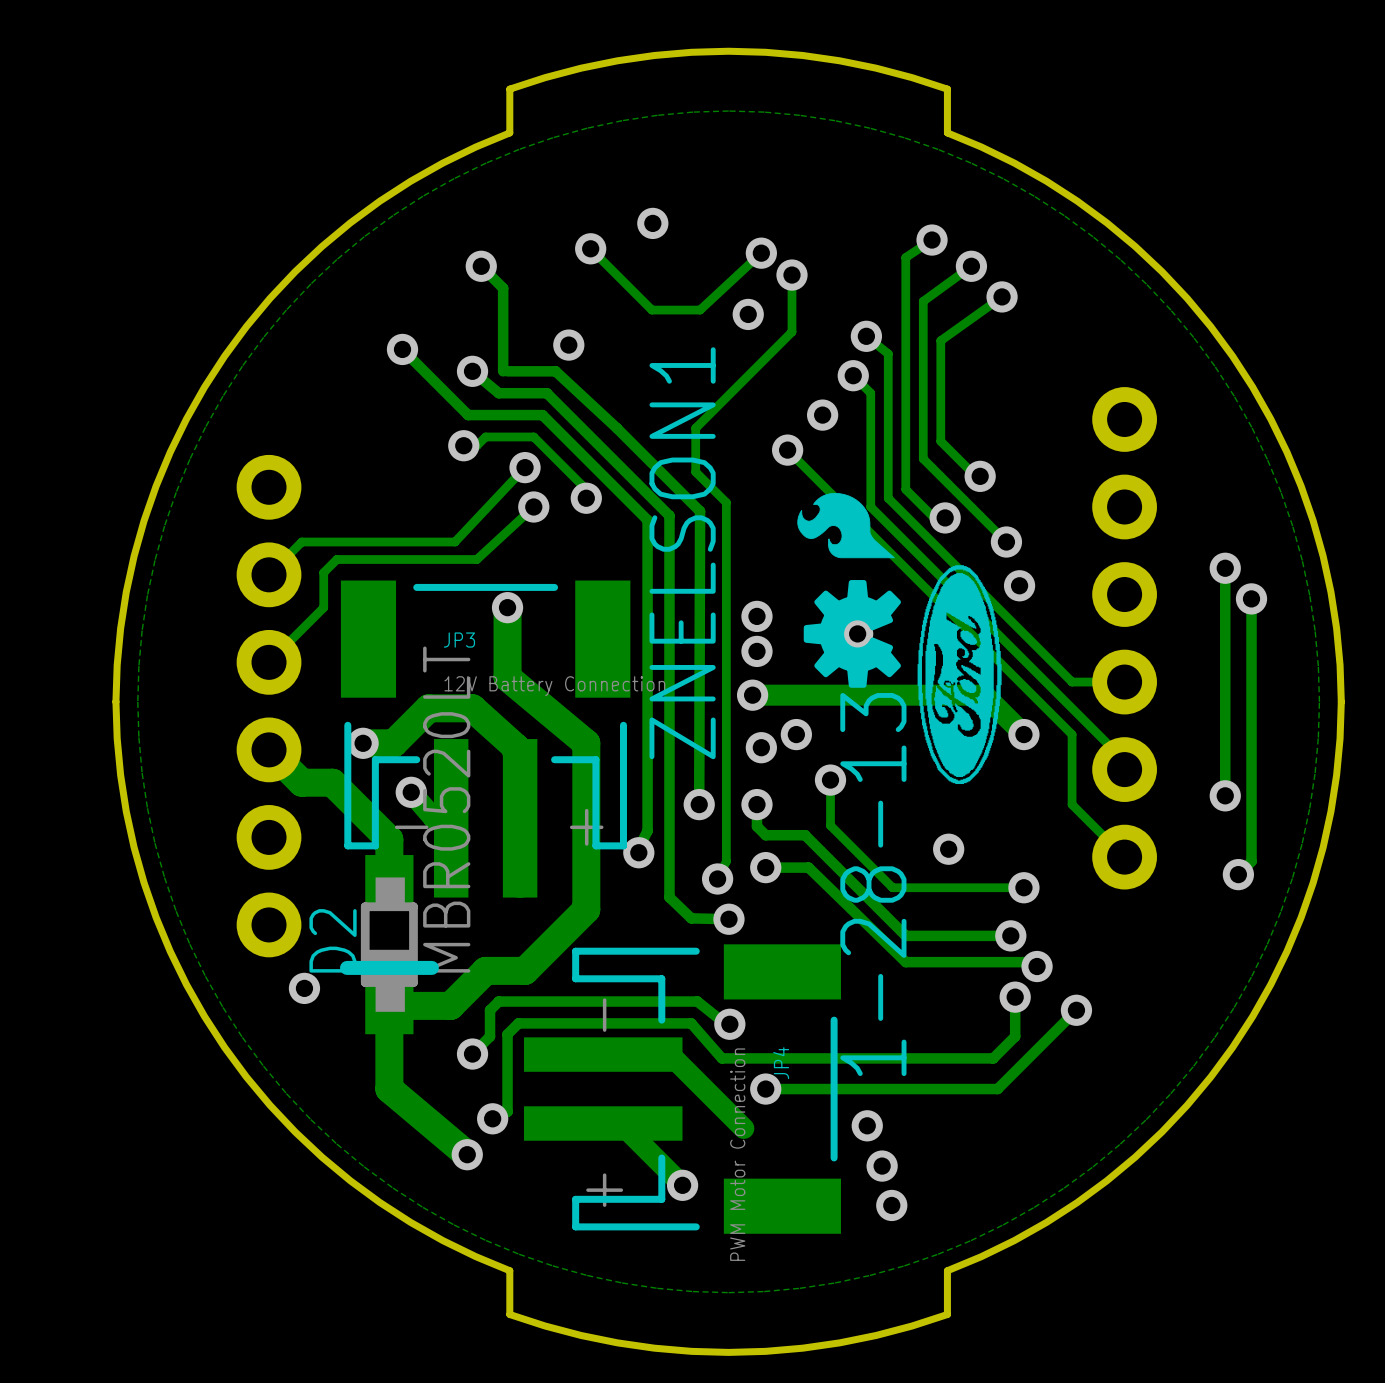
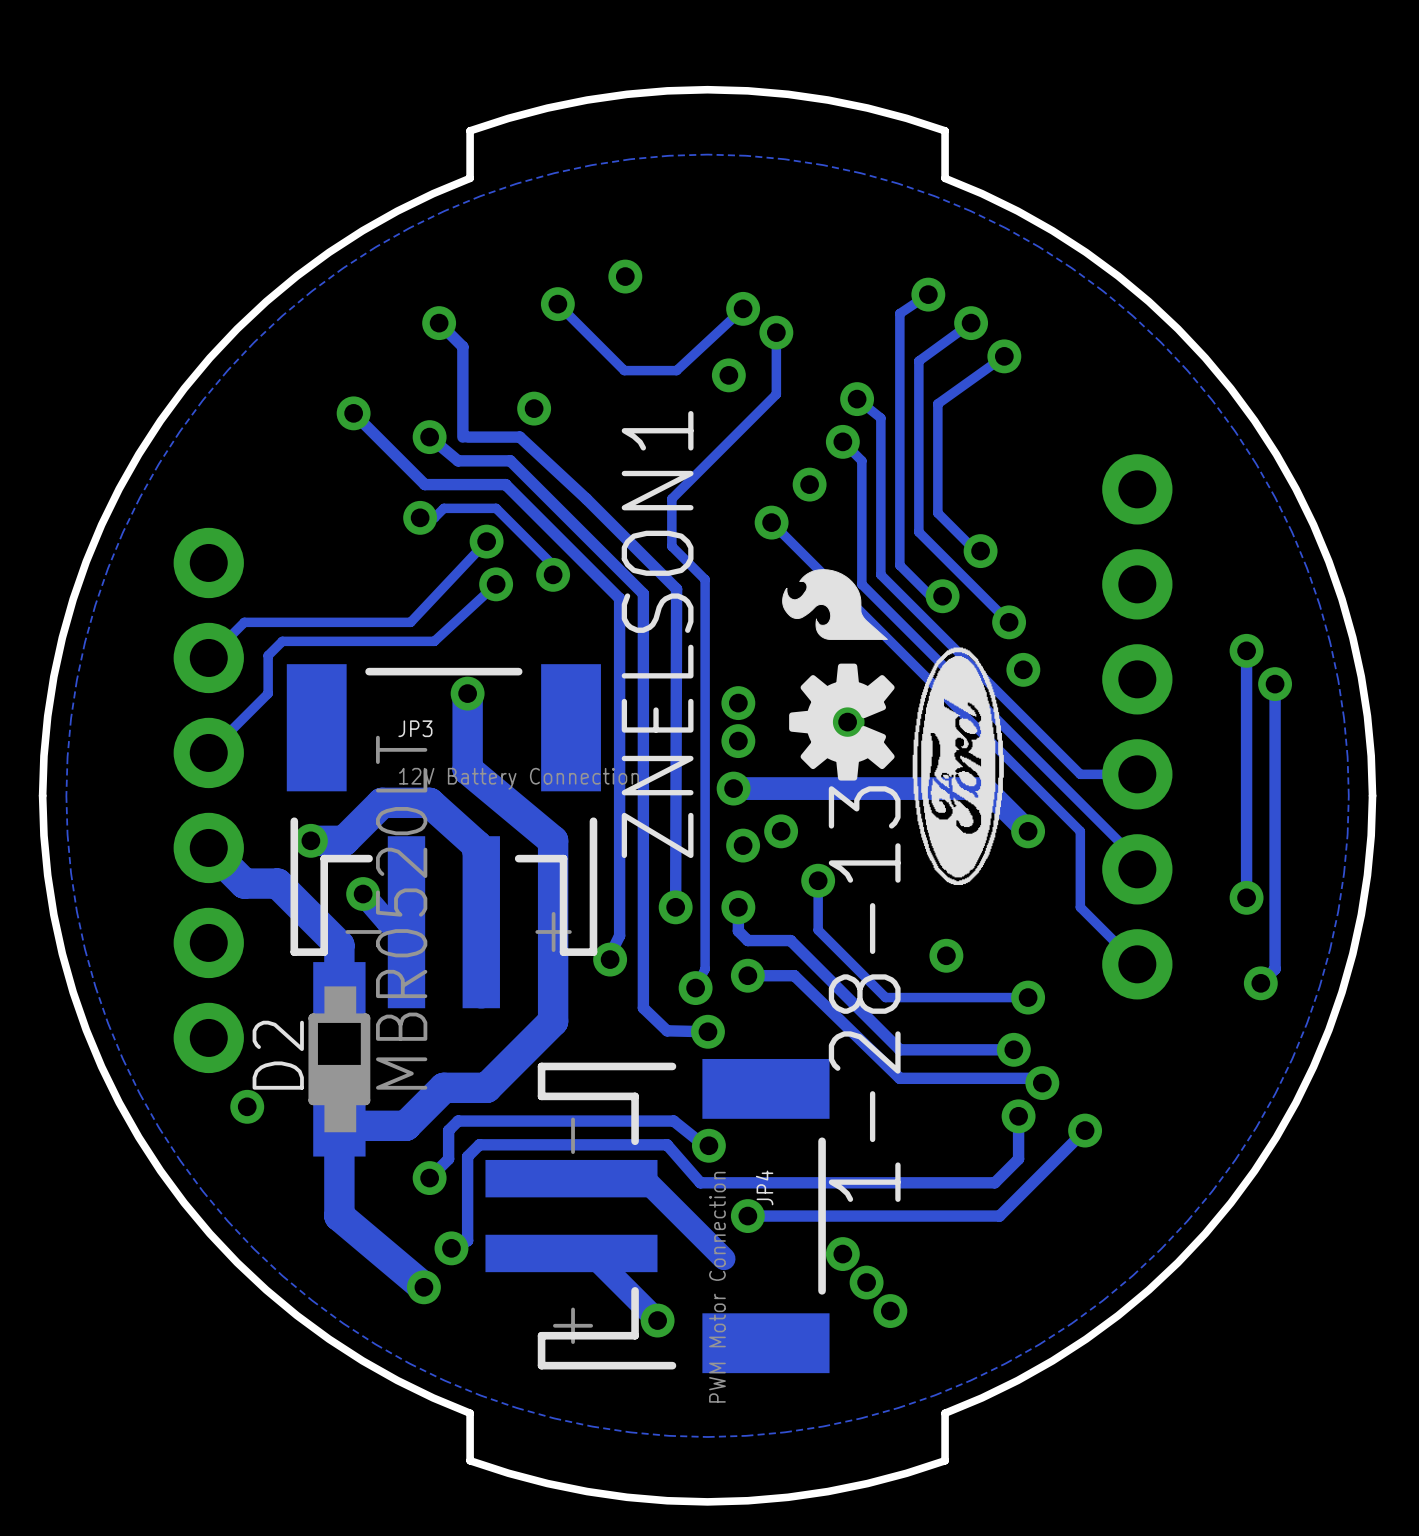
line: (431, 967) (347, 967) -> none
via: none -> (842, 1254)
via: (867, 1125) -> none
via: none -> (866, 1282)
via: (882, 1166) -> none
via: none -> (890, 1311)
via: (891, 1205) -> none

